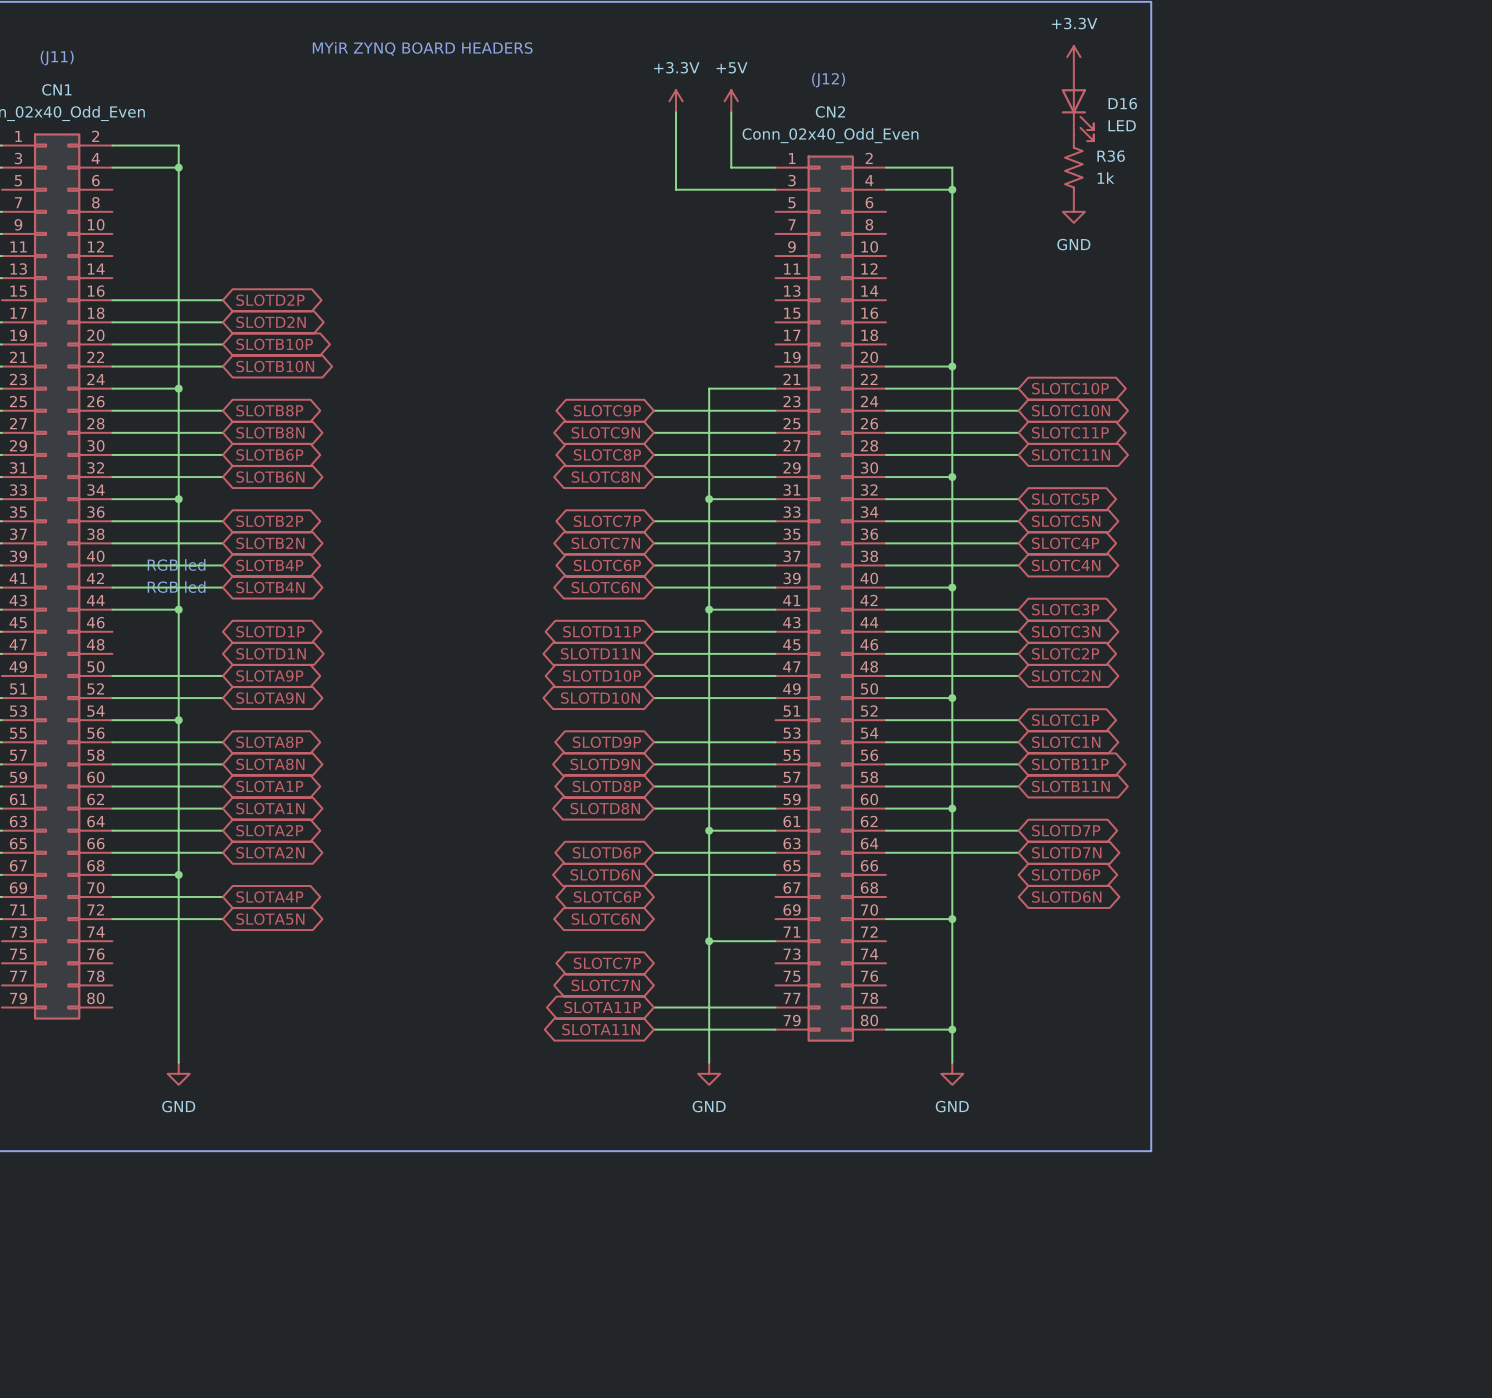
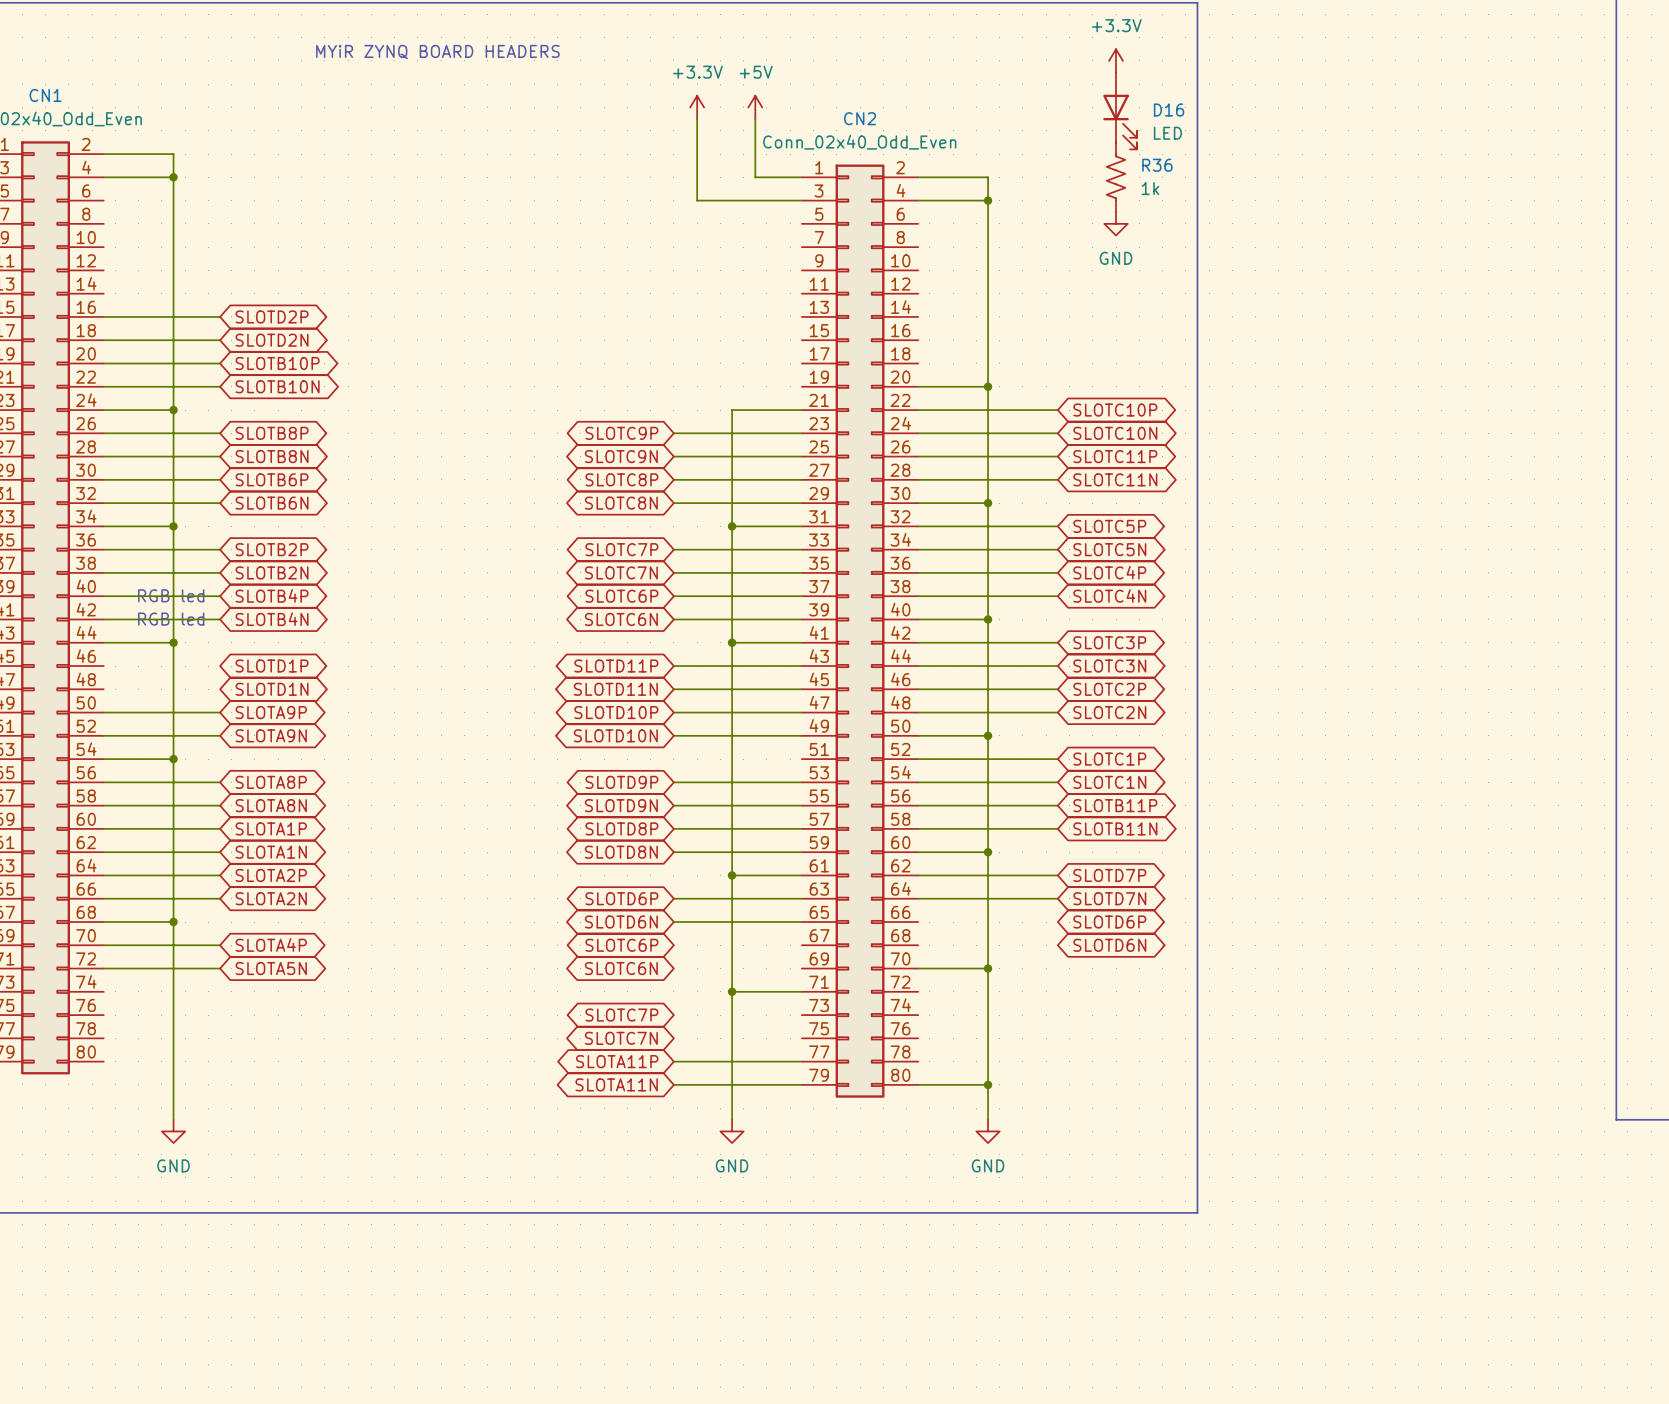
text: (J11) (57, 58) -> none
text: (J12) (828, 80) -> none

